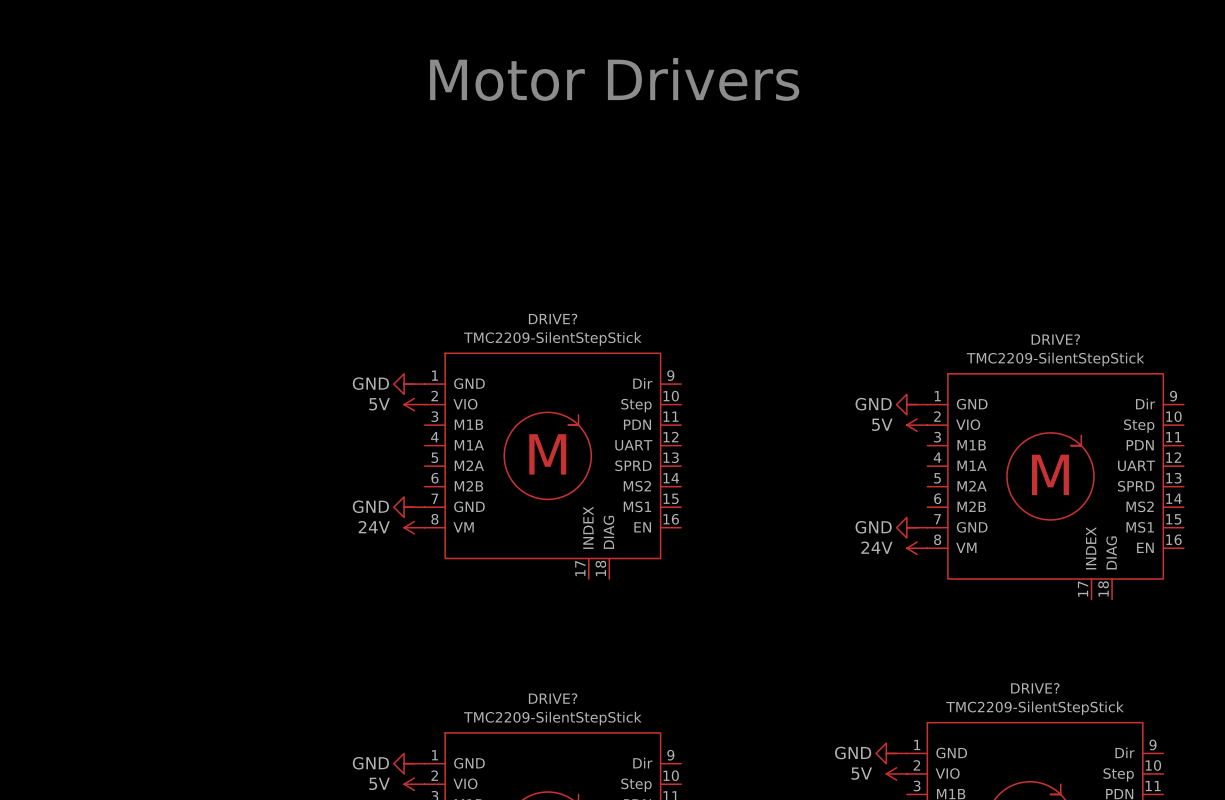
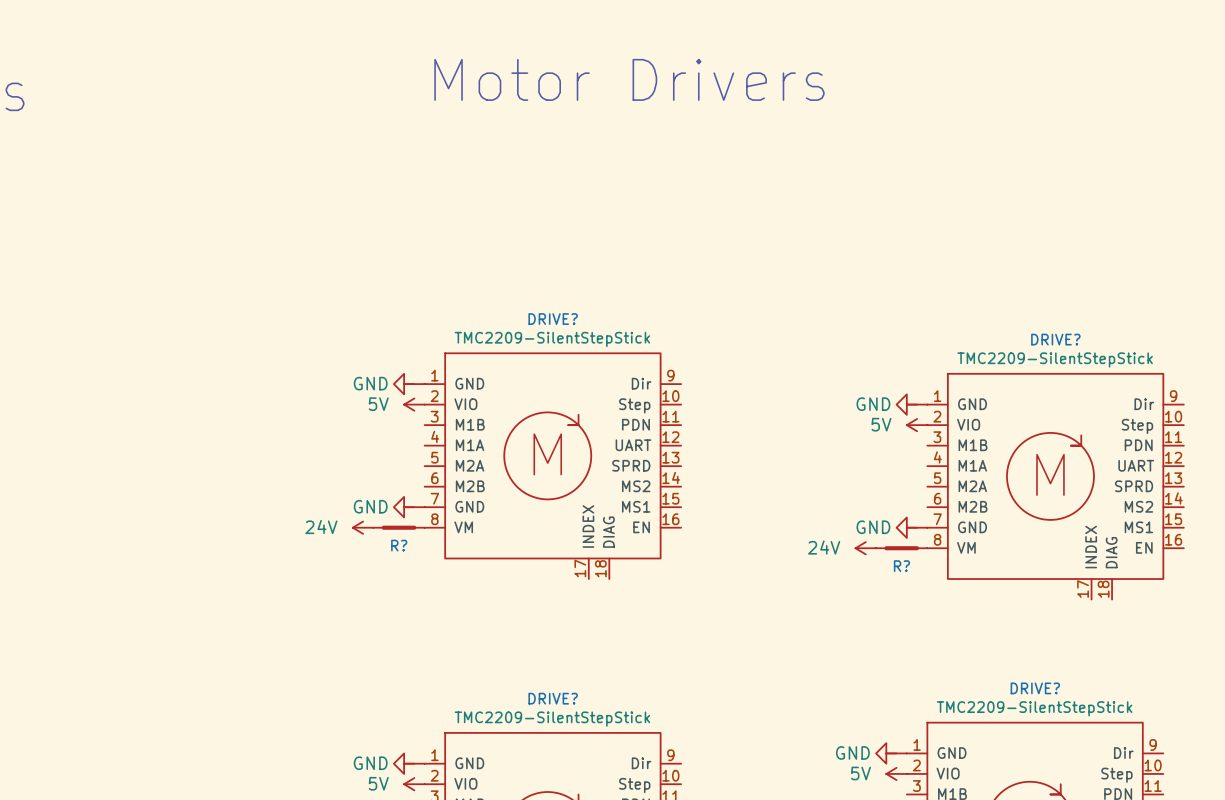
R?: none -> (398, 527)
power symbol position: 24V (414, 527) -> 24V (363, 527)
R?: none -> (901, 548)
power symbol position: 24V (917, 548) -> 24V (865, 548)

